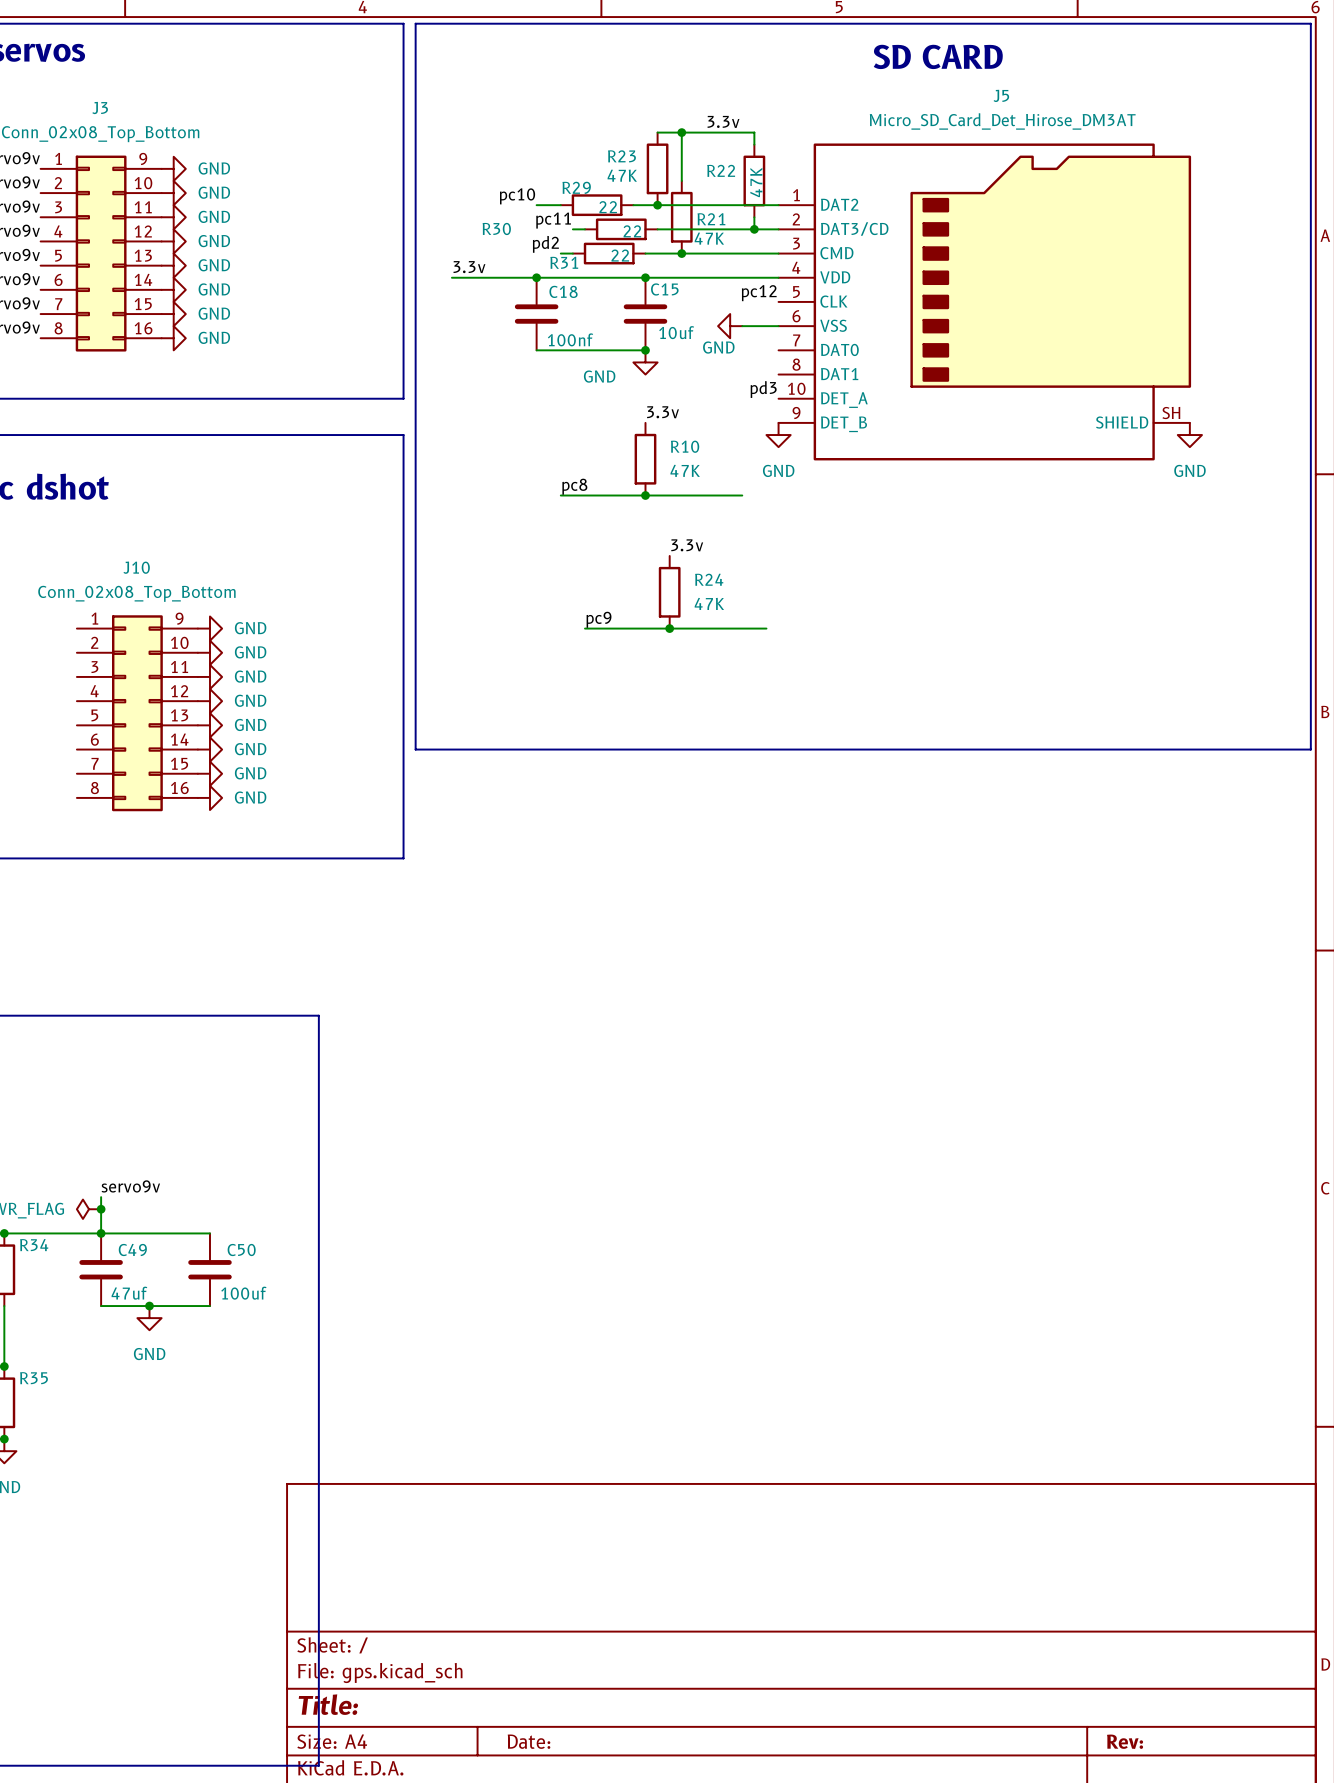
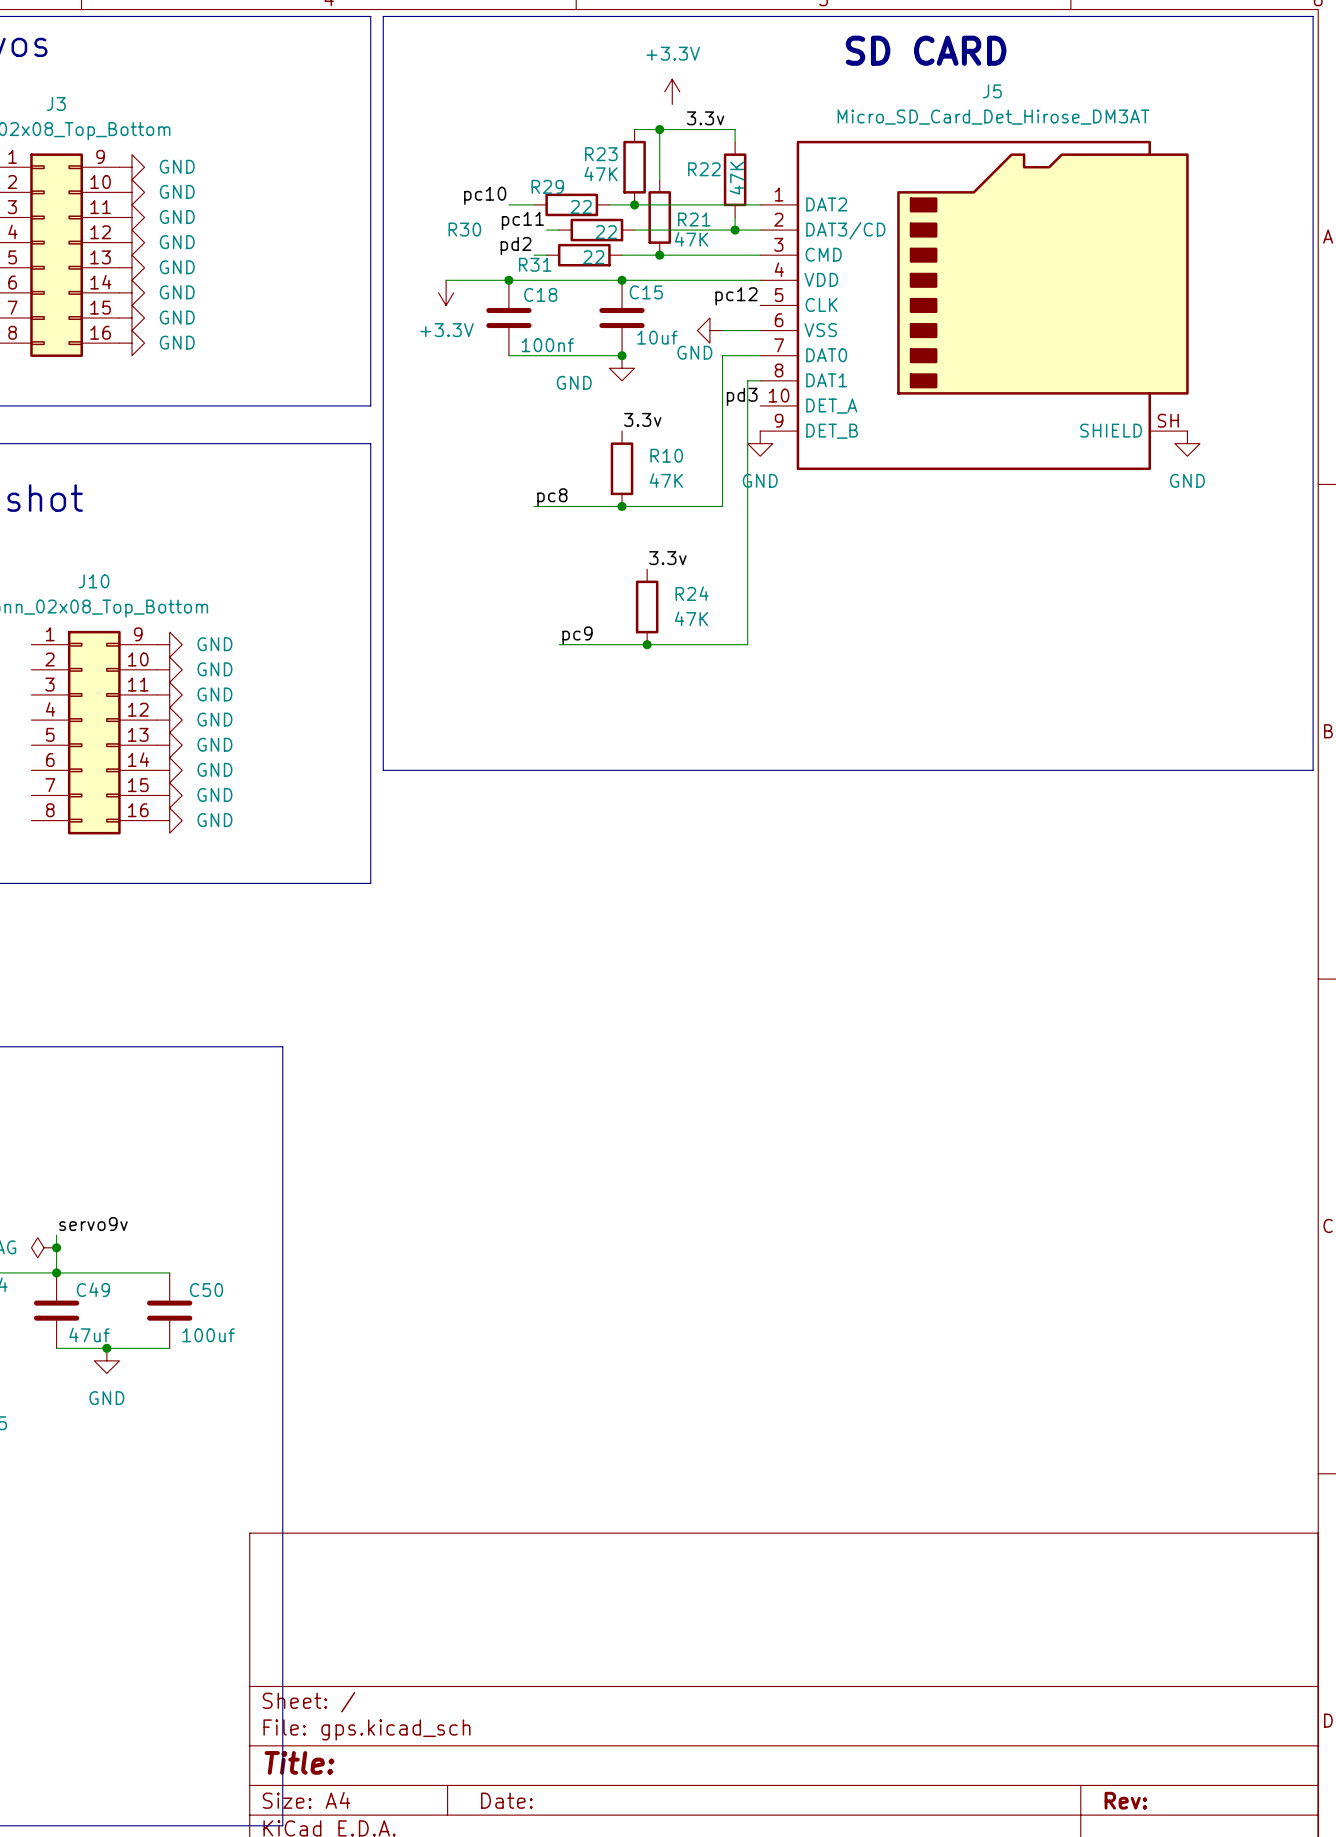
power symbol: none -> +3.3V (672, 91)
label: 3.3v (469, 267) -> none
wire: (451, 277) (476, 277) -> none
power symbol: none -> +3.3V (446, 292)
wire: none -> (760, 355) (722, 355) (722, 506)
wire: none -> (760, 380) (747, 380) (747, 644)

